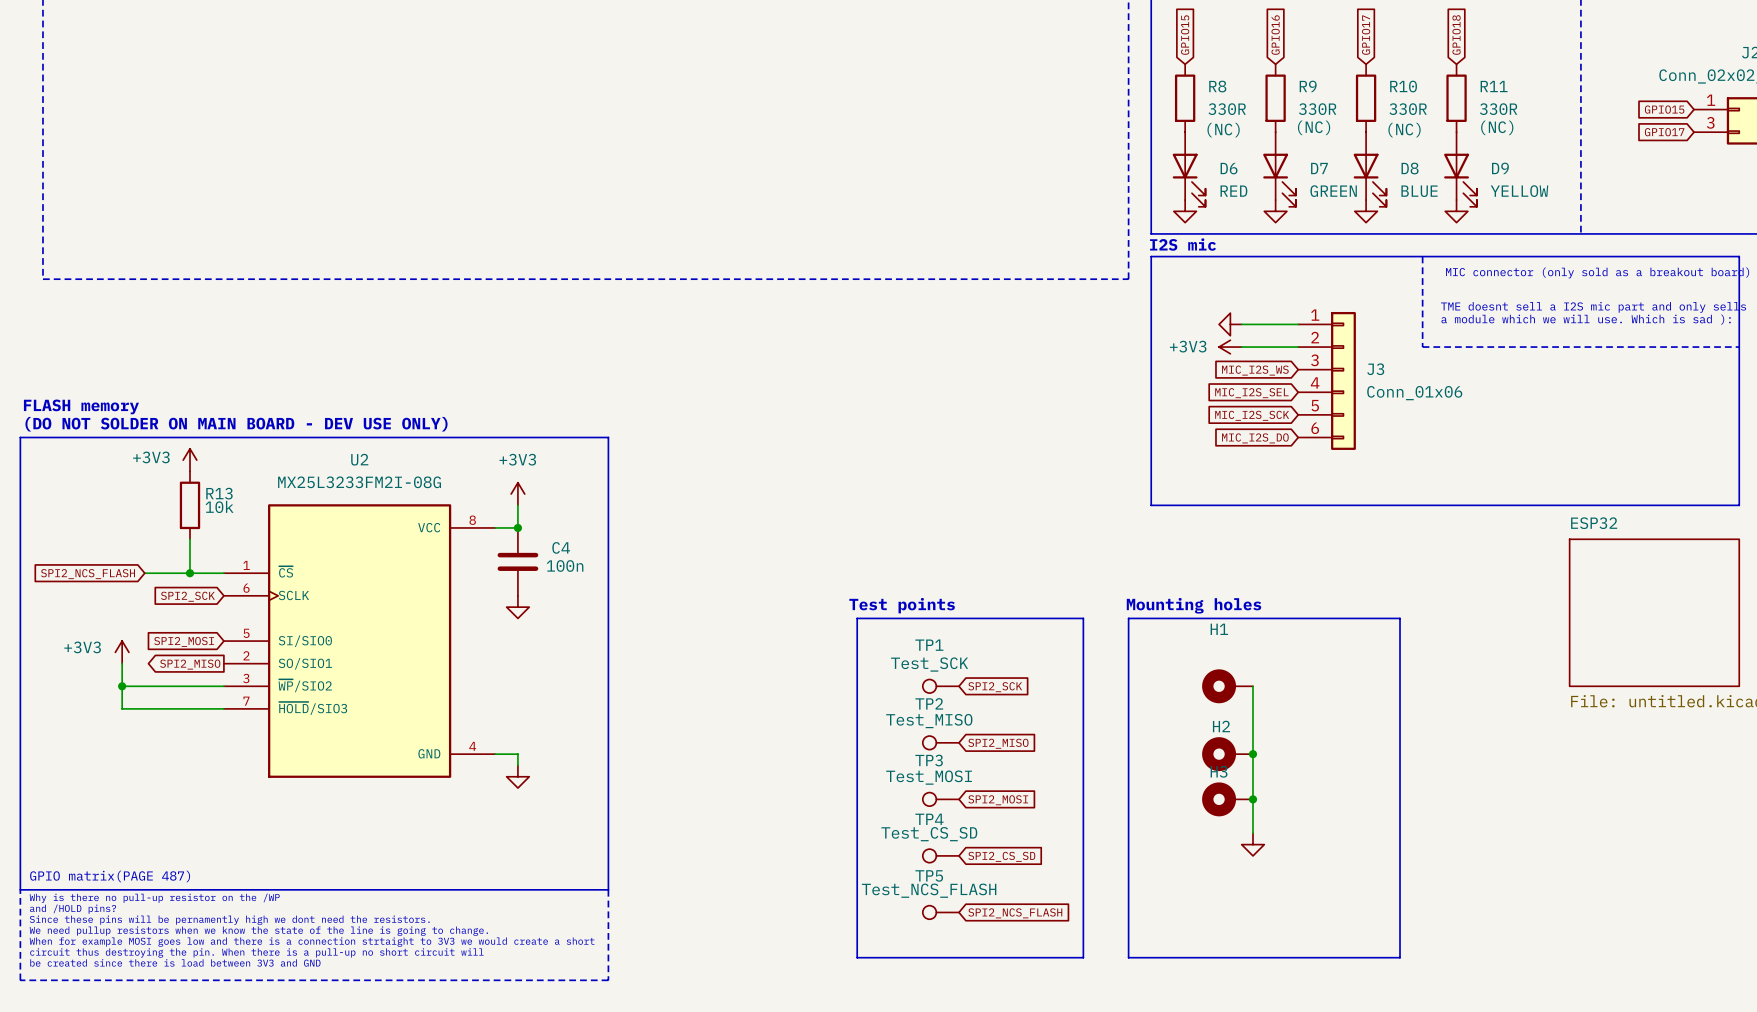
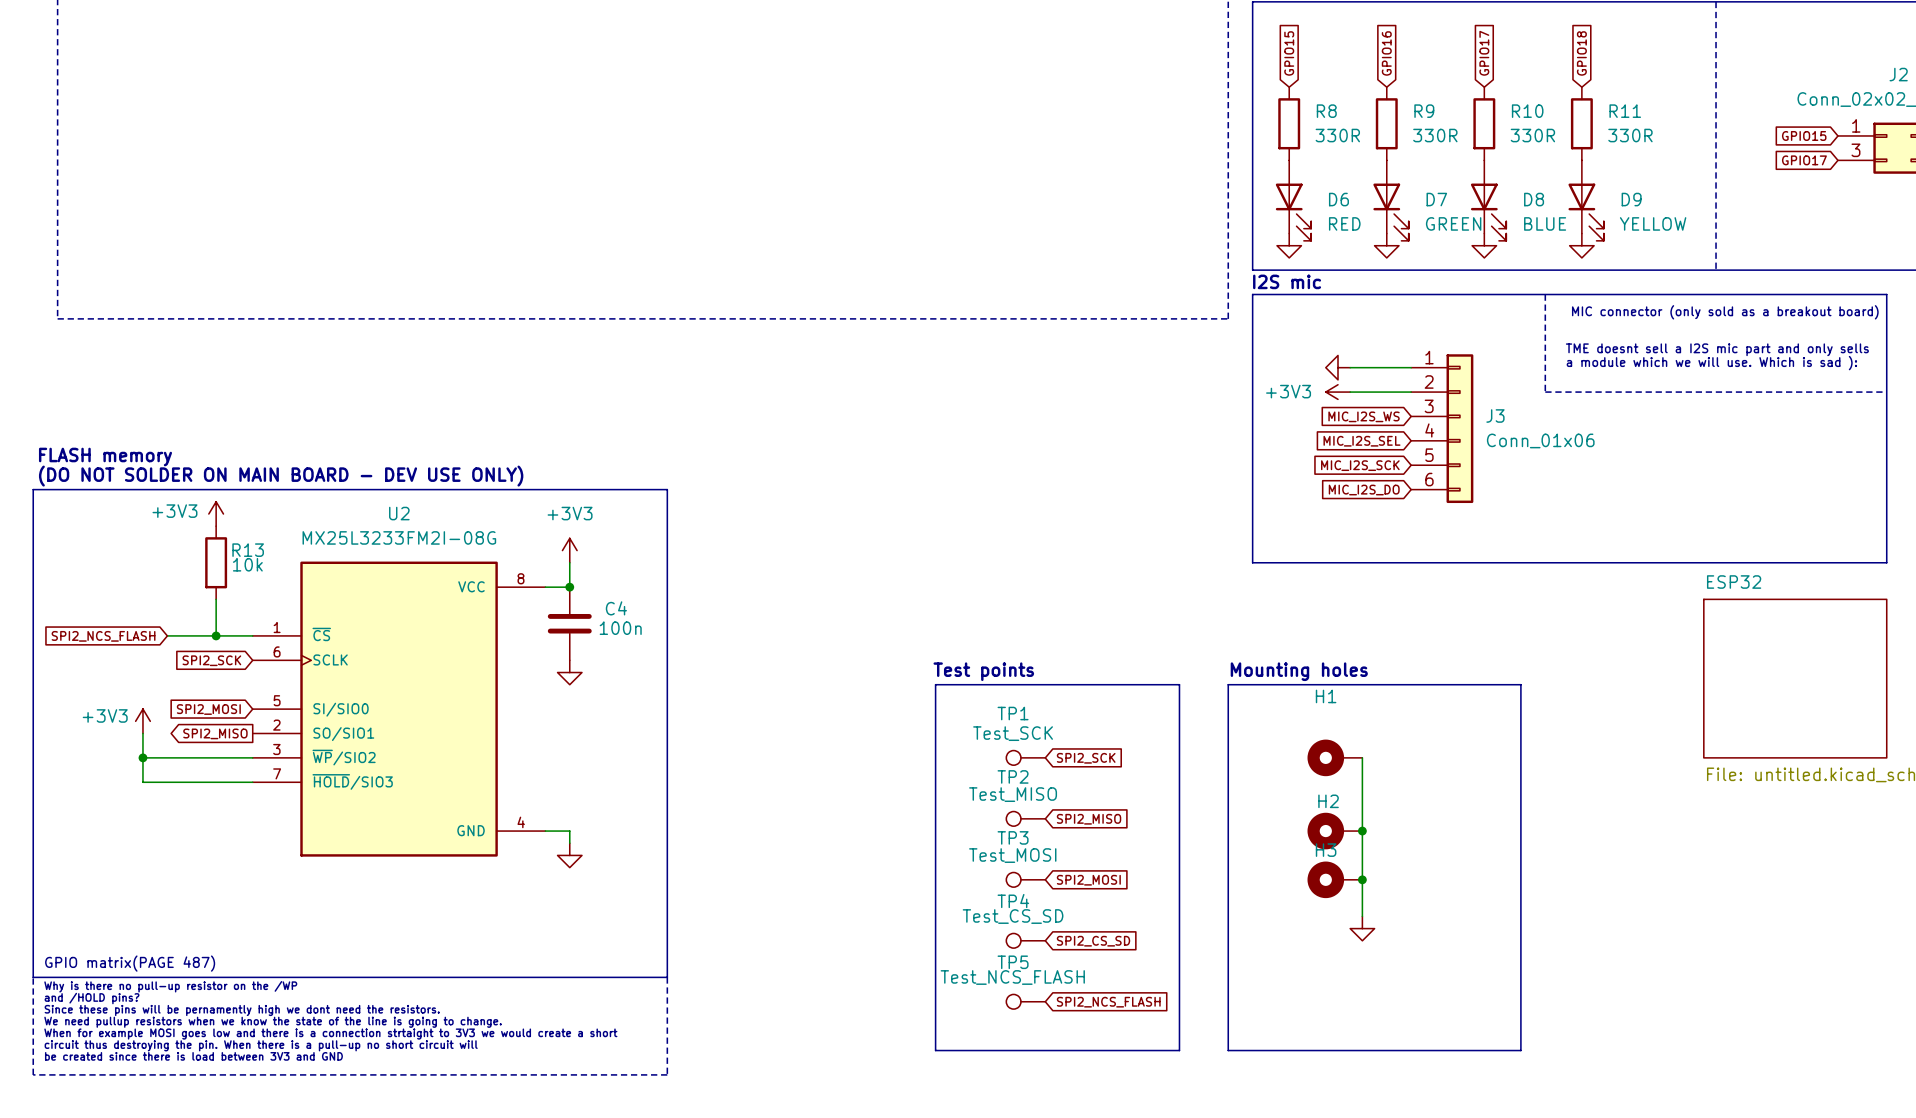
R9 text: (NC) (1314, 127) -> none
R11 text: (NC) (1497, 127) -> none
R8 text: (NC) (1223, 130) -> none
R10 text: (NC) (1404, 130) -> none

